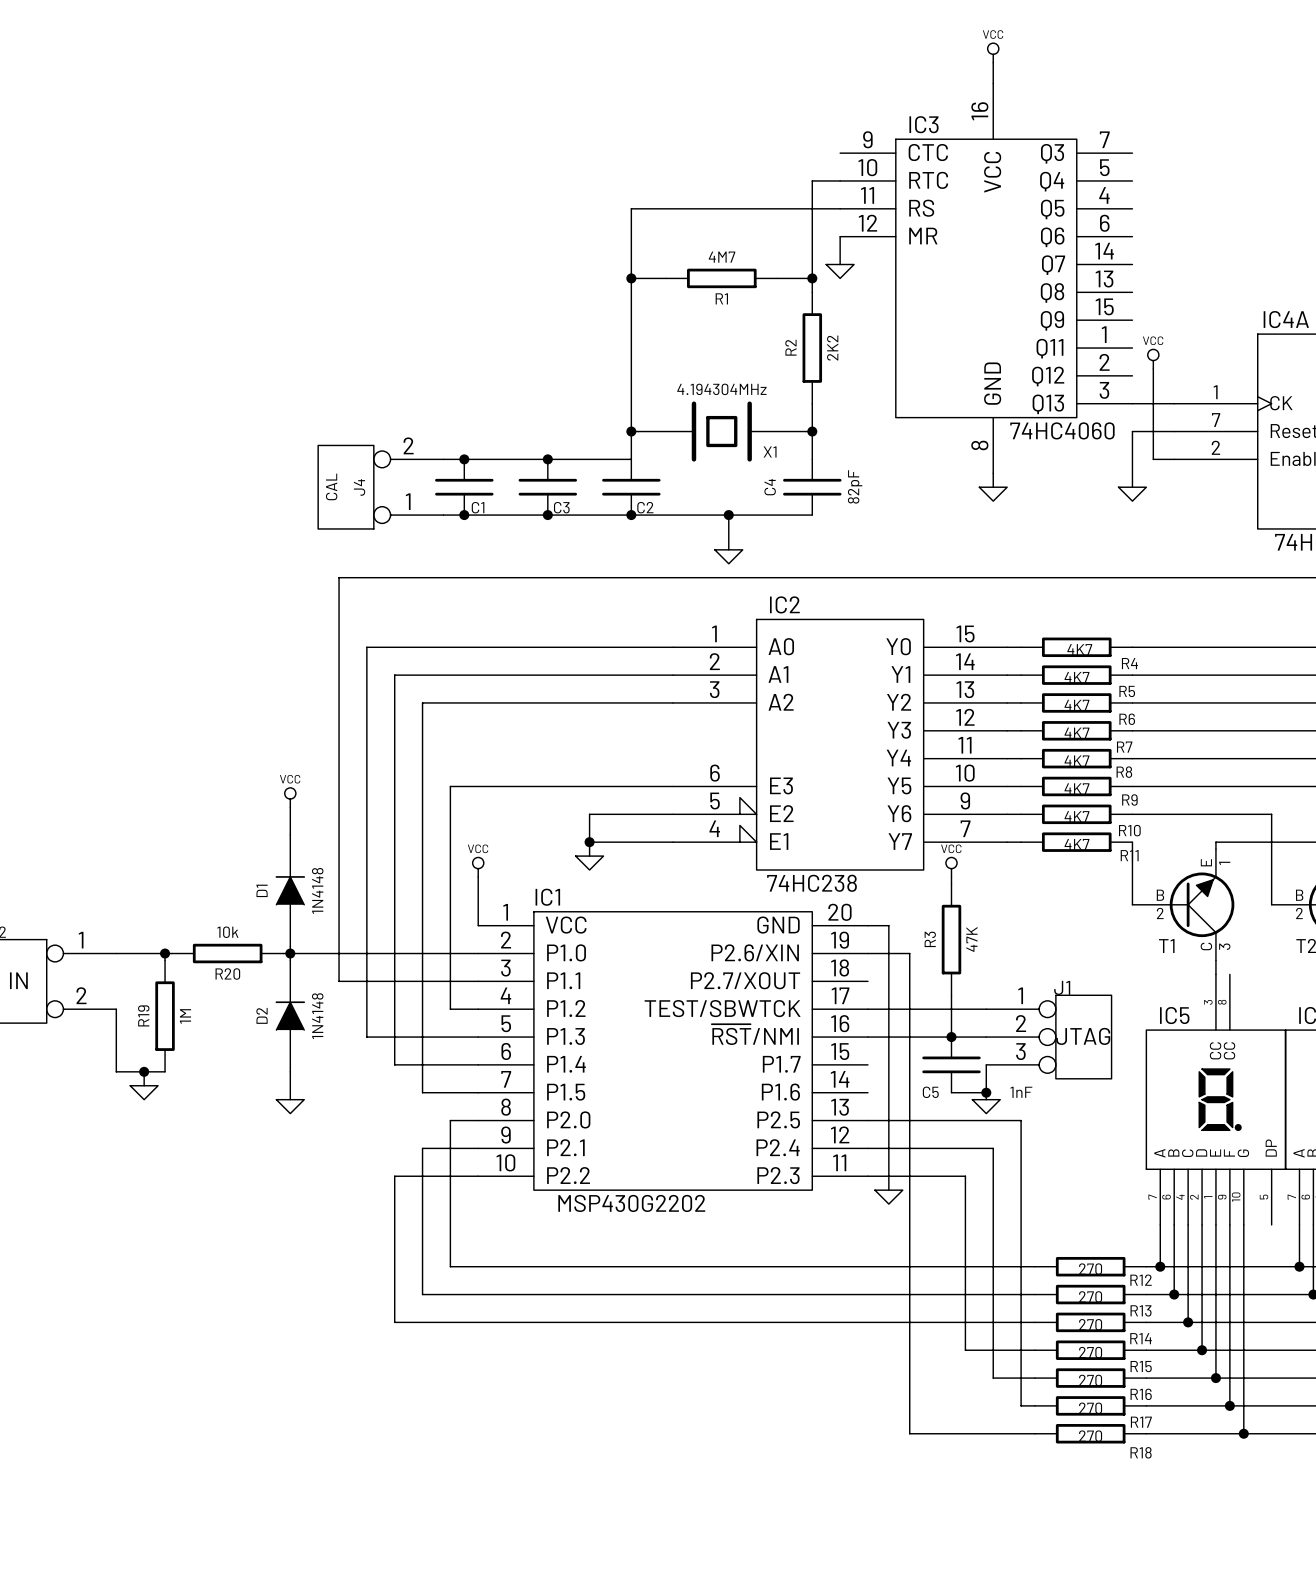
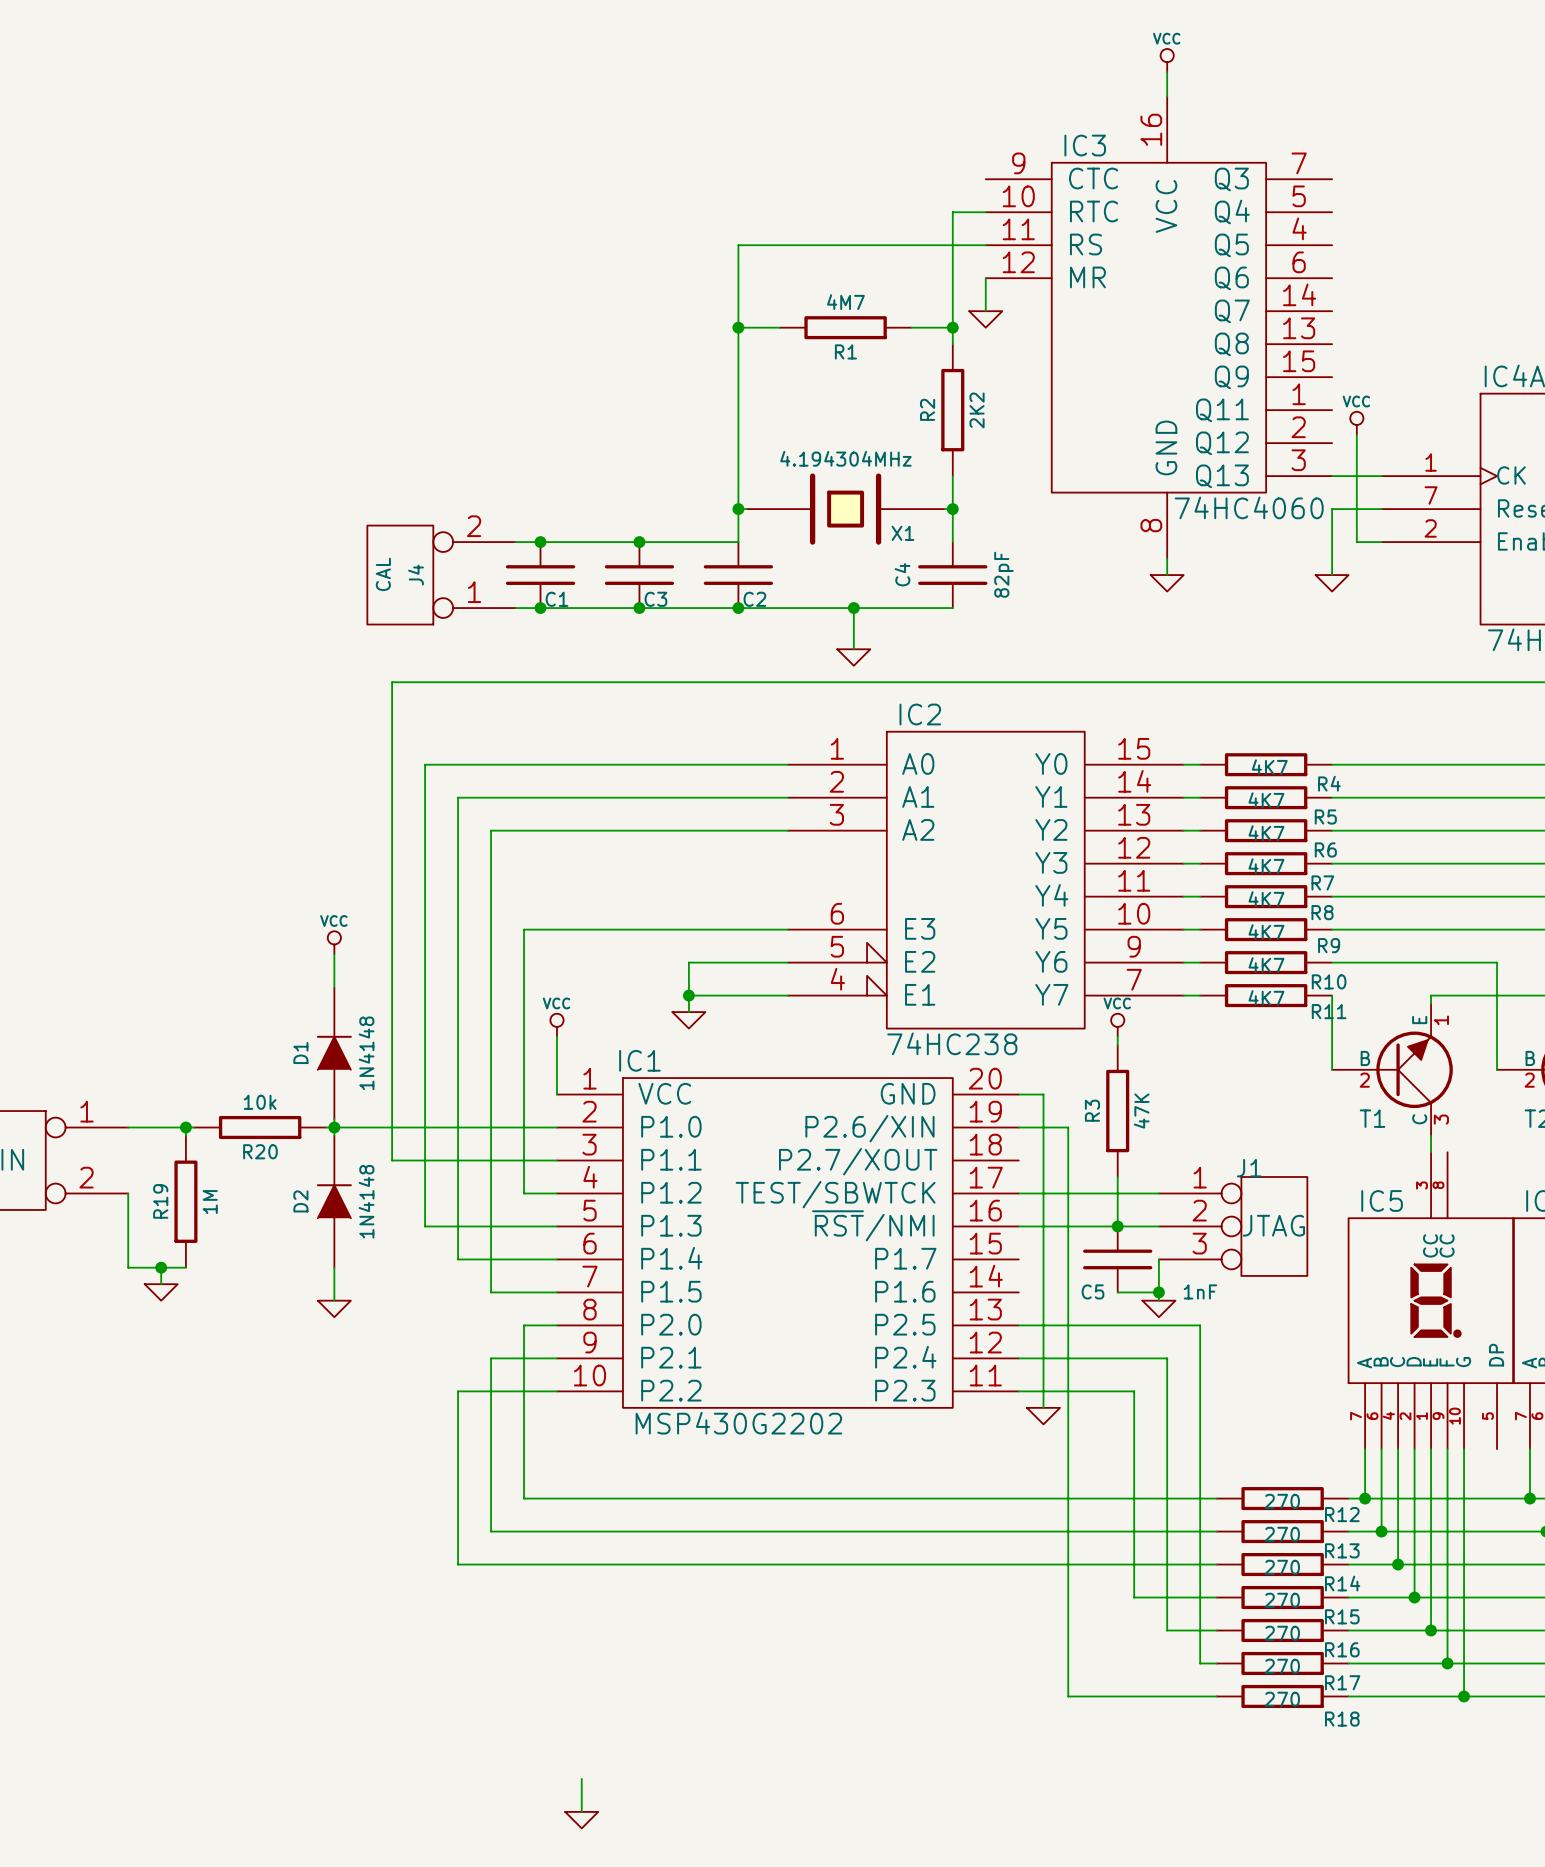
wire: none -> (581, 1778) (581, 1811)
power symbol: none -> (581, 1820)

